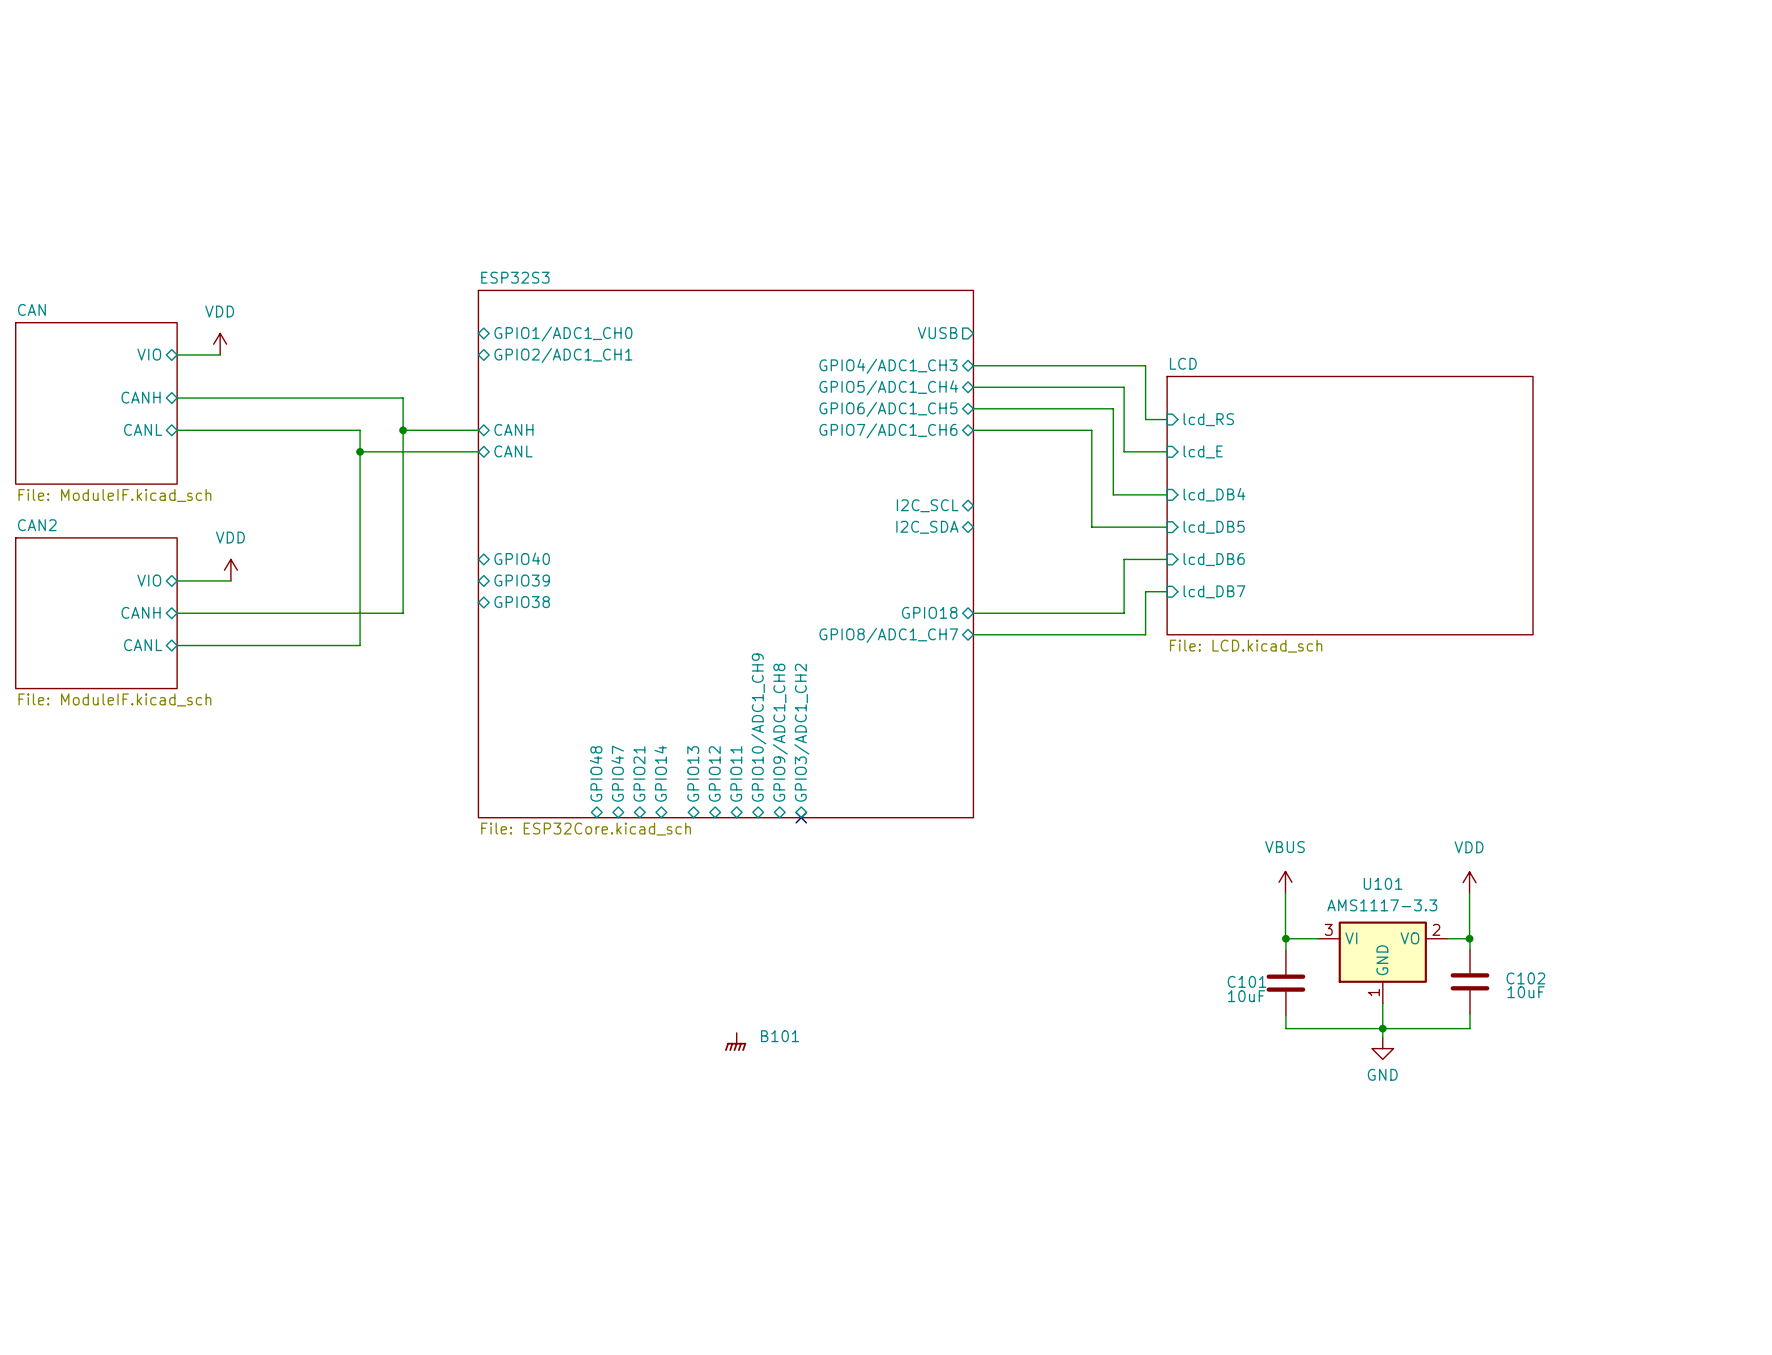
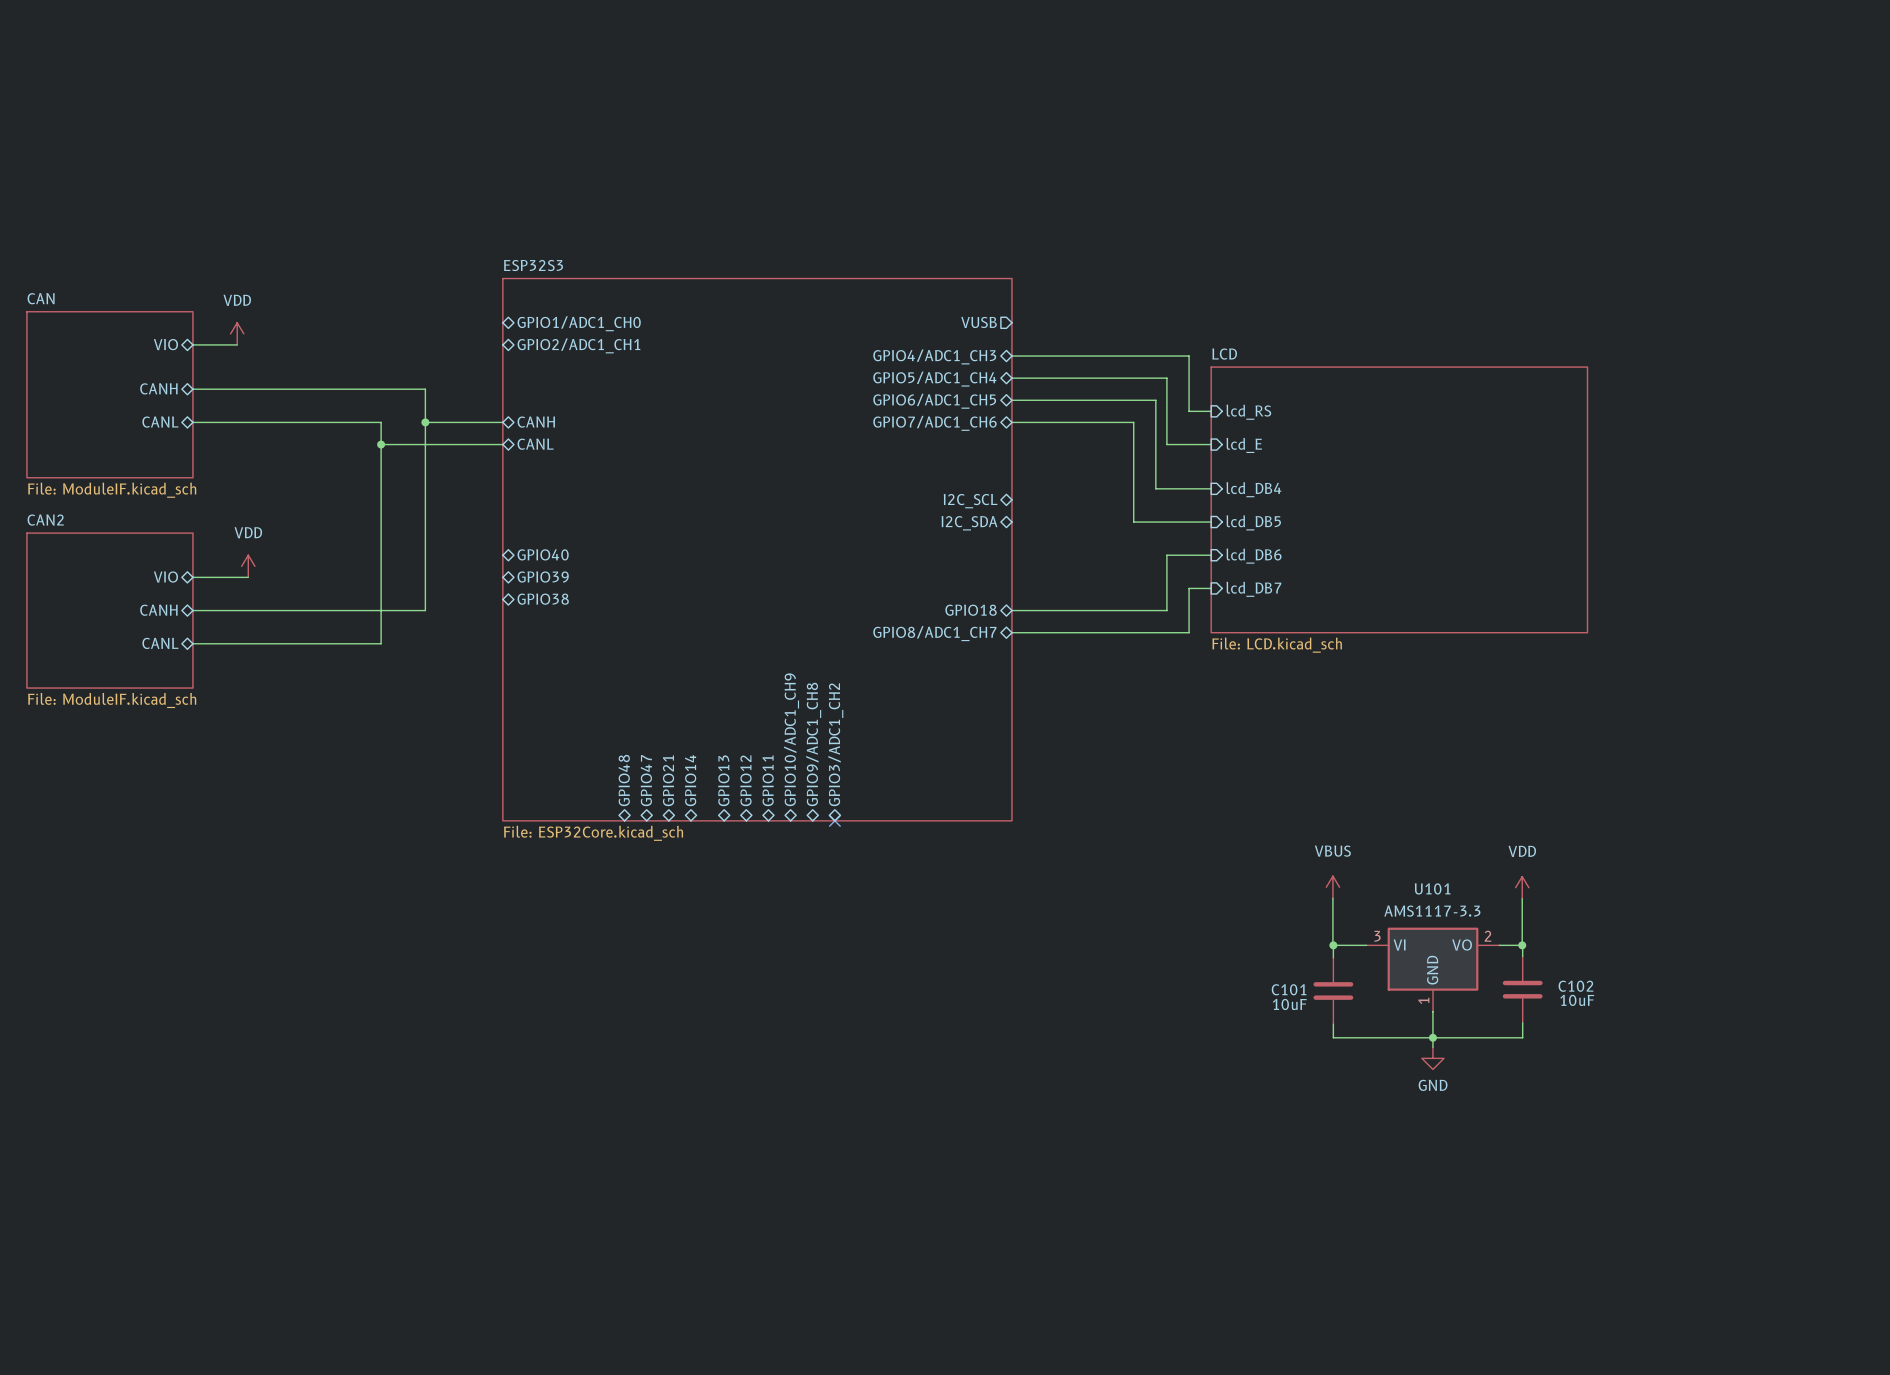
B101: (735, 1041) -> none

